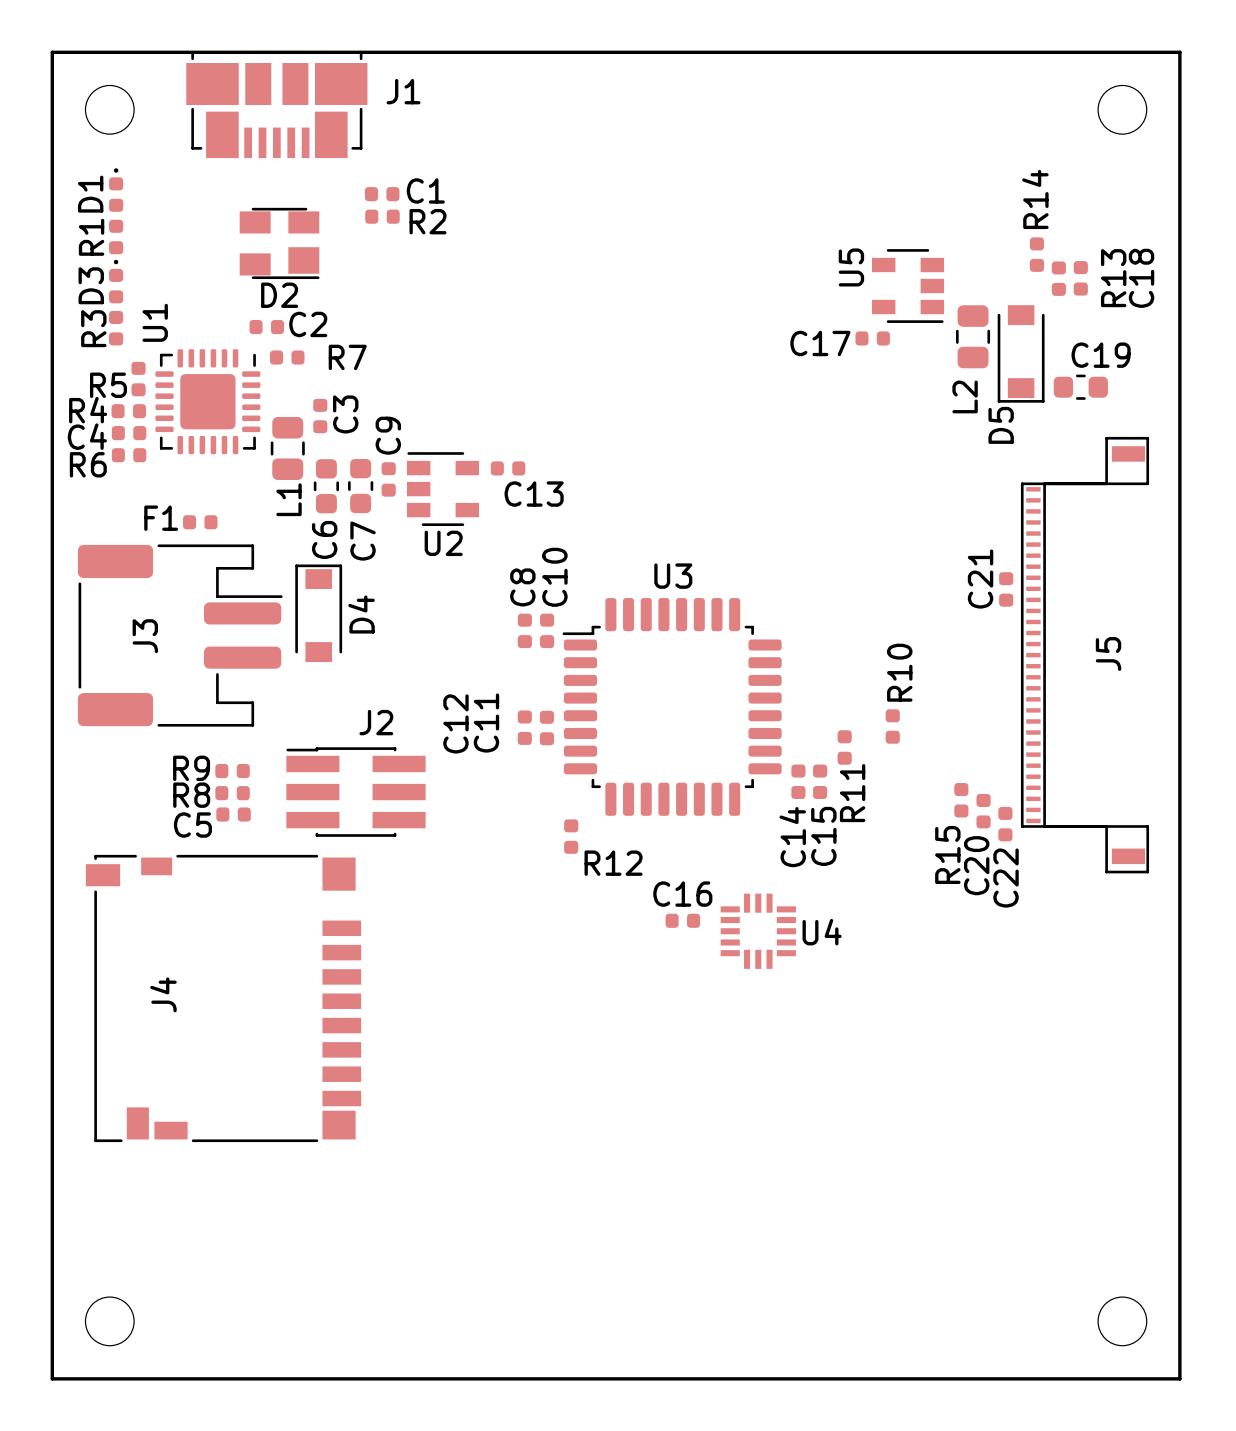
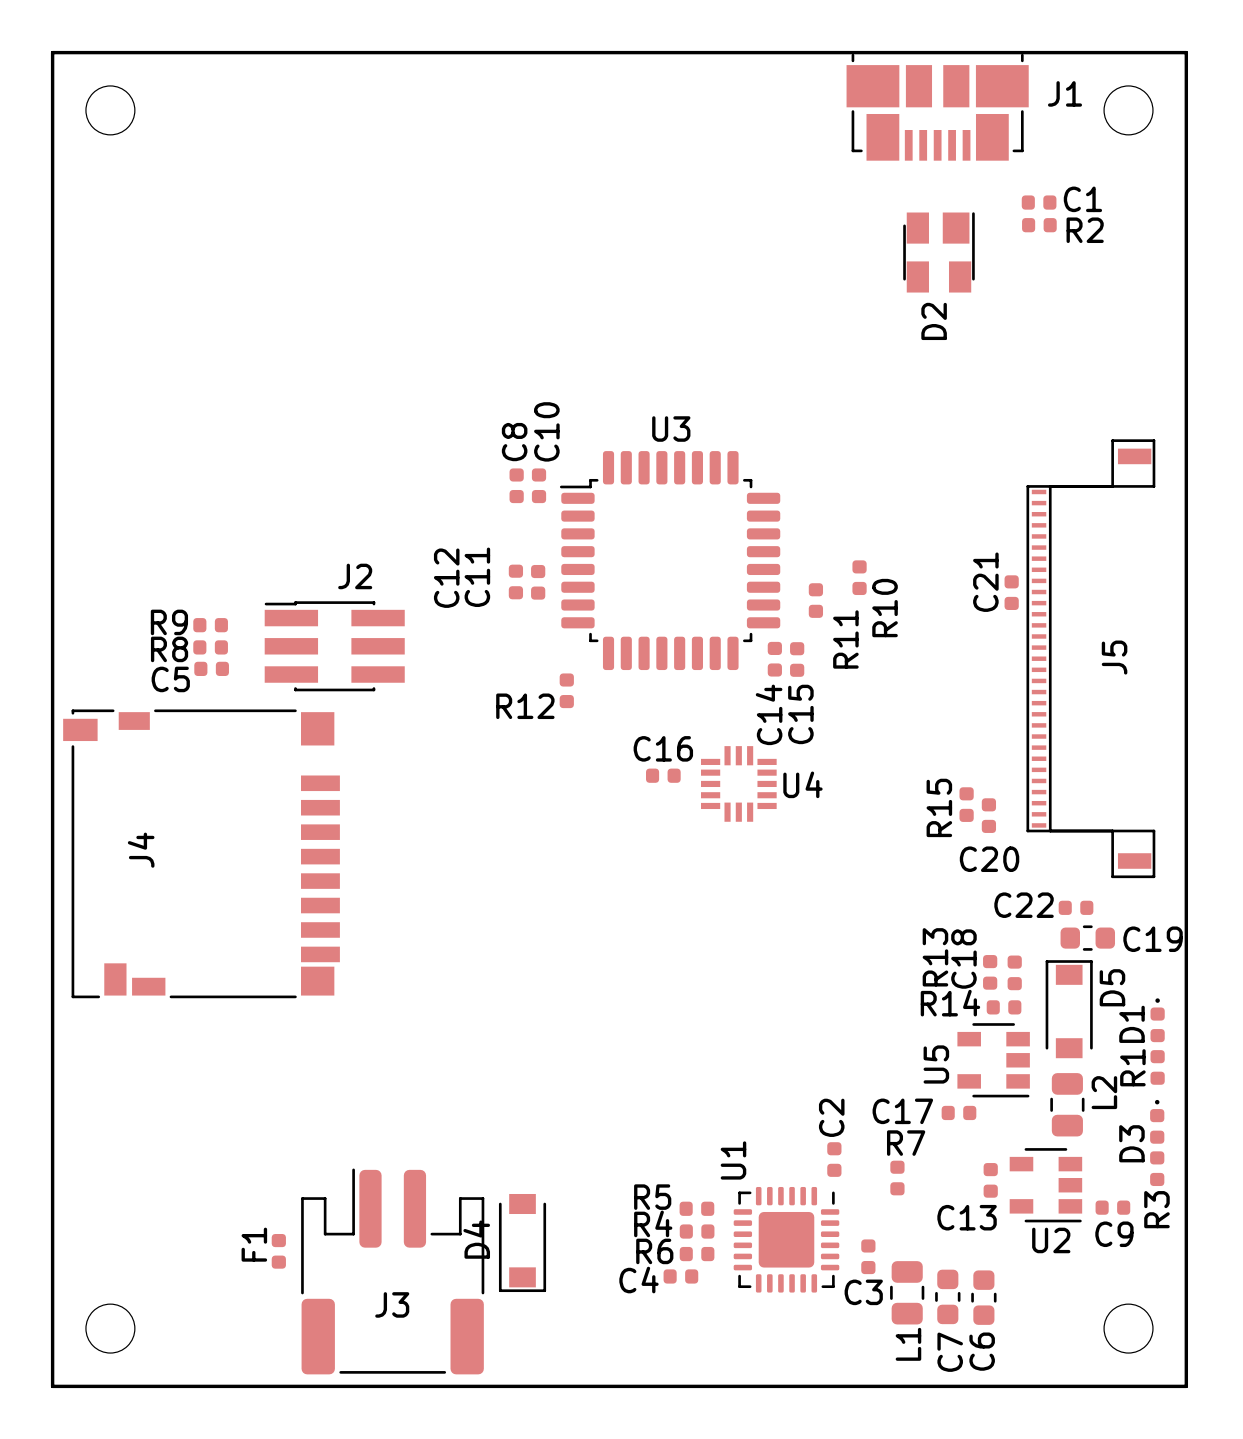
J1 position: (276, 104) -> (937, 107)
D1 position: (116, 190) -> (1157, 1020)
C1 position: (382, 194) -> (1039, 202)
R14 name position: R14 (1035, 199) -> R14 (950, 1003)
R2 position: (382, 216) -> (1039, 225)
R1 position: (116, 236) -> (1157, 1067)
D2 rotation: 0° (279, 243) -> 90° counterclockwise (938, 252)
D2 position: (279, 243) -> (938, 252)
R14 rotation: 0° (1036, 254) -> 90° clockwise (1004, 1007)
R14 position: (1036, 254) -> (1004, 1007)
U5 name position: U5 (851, 267) -> U5 (936, 1064)
R13 position: (1058, 278) -> (990, 972)
C18 position: (1080, 278) -> (1014, 972)
R13 name position: R13 (1113, 278) -> R13 (935, 957)
C18 name position: C18 (1141, 278) -> C18 (963, 959)
D3 position: (116, 281) -> (1157, 1121)
D3 name position: D3 (91, 285) -> D3 (1131, 1143)
U5 position: (908, 286) -> (993, 1060)
C2 name position: C2 (308, 324) -> C2 (831, 1117)
C2 rotation: 0° (266, 327) -> 90° clockwise (834, 1159)
C2 position: (266, 327) -> (834, 1159)
R3 name position: R3 (93, 328) -> R3 (1156, 1209)
R3 position: (116, 328) -> (1157, 1168)
L2 position: (973, 336) -> (1067, 1104)
C17 position: (872, 338) -> (958, 1112)
C17 name position: C17 (820, 343) -> C17 (902, 1111)
D5 rotation: 0° (1021, 353) -> 180° (1069, 1009)
D5 position: (1021, 353) -> (1069, 1009)
C19 name position: C19 (1101, 355) -> C19 (1153, 939)
R7 rotation: 0° (287, 357) -> 90° clockwise (897, 1178)
R7 position: (287, 357) -> (897, 1178)
R7 name position: R7 (347, 357) -> R7 (906, 1143)
R5 rotation: 0° (138, 379) -> 90° clockwise (696, 1208)
R5 position: (138, 379) -> (696, 1208)
C19 position: (1080, 387) -> (1087, 938)
L2 name position: L2 (965, 396) -> L2 (1104, 1092)
U1 position: (207, 401) -> (786, 1239)
R4 name position: R4 (88, 410) -> R4 (653, 1223)
R4 position: (128, 411) -> (697, 1231)
C3 name rotation: 0° (345, 414) -> 90° clockwise (863, 1292)
C3 position: (320, 416) -> (868, 1256)
D5 name position: D5 (1001, 425) -> D5 (1112, 987)
C4 position: (129, 433) -> (680, 1276)
C9 name position: C9 (388, 435) -> C9 (1114, 1234)
L1 position: (287, 448) -> (907, 1292)
R6 position: (129, 455) -> (697, 1254)
R6 name position: R6 (88, 464) -> R6 (654, 1251)
C13 rotation: 0° (508, 468) -> 90° clockwise (990, 1180)
C13 position: (508, 468) -> (990, 1180)
C9 rotation: 0° (388, 479) -> 90° clockwise (1112, 1207)
C9 position: (388, 479) -> (1112, 1207)
C6 position: (326, 486) -> (983, 1297)
C7 position: (360, 486) -> (947, 1296)
U2 rotation: 0° (442, 489) -> 180° (1045, 1185)
U2 position: (442, 489) -> (1045, 1185)
F1 rotation: 0° (200, 522) -> 90° clockwise (278, 1251)
F1 position: (200, 522) -> (278, 1251)
D4 rotation: 0° (318, 613) -> 180° (522, 1243)
D4 position: (318, 613) -> (522, 1243)
C8 position: (524, 630) -> (516, 485)
C10 position: (547, 630) -> (539, 485)
J3 rotation: 0° (180, 635) -> 90° counterclockwise (392, 1271)
J3 position: (180, 635) -> (392, 1271)
R10 name position: R10 (899, 672) -> R10 (885, 608)
U3 position: (672, 706) -> (670, 560)
R10 position: (892, 726) -> (859, 577)
C12 position: (524, 727) -> (515, 581)
C11 position: (546, 728) -> (538, 582)
R11 position: (844, 747) -> (815, 600)
R9 position: (232, 771) -> (210, 625)
C14 position: (798, 781) -> (774, 659)
C15 position: (820, 781) -> (797, 659)
J2 position: (355, 792) -> (334, 646)
R8 position: (232, 793) -> (210, 647)
R11 name position: R11 (852, 793) -> R11 (845, 639)
C5 position: (233, 814) -> (211, 668)
C22 rotation: 0° (1005, 824) -> 90° clockwise (1076, 907)
C22 position: (1005, 824) -> (1076, 907)
R12 position: (571, 836) -> (566, 690)
R15 name position: R15 (947, 854) -> R15 (939, 807)
R12 name position: R12 (613, 863) -> R12 (525, 706)
C20 name rotation: 0° (976, 865) -> 90° clockwise (989, 859)
C16 position: (682, 920) -> (663, 775)
U4 position: (758, 931) -> (738, 783)
J4 position: (223, 998) -> (201, 853)

